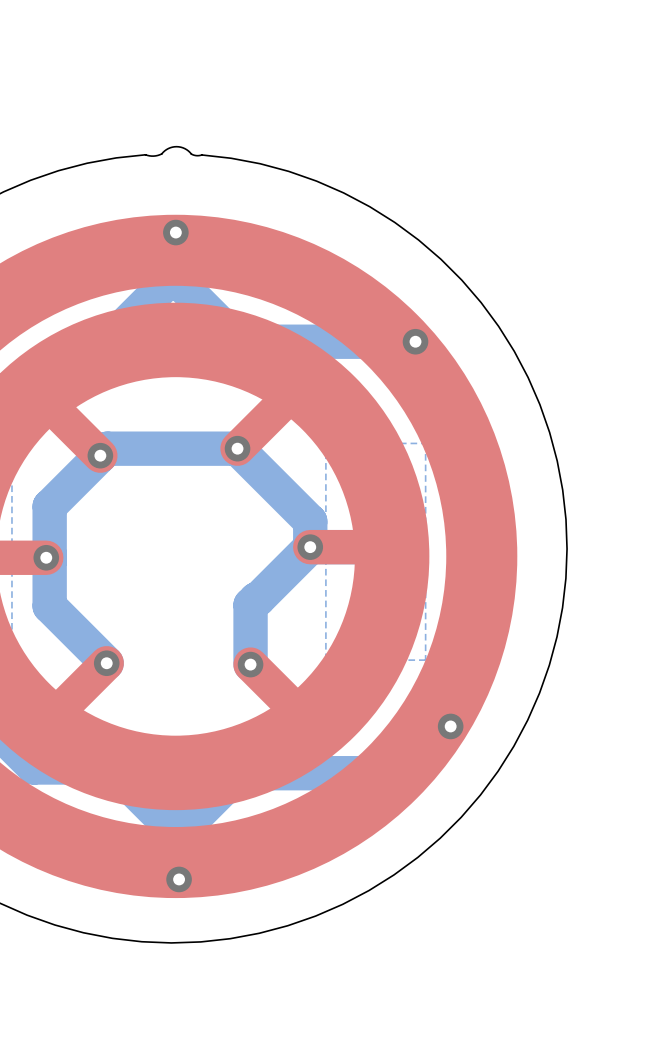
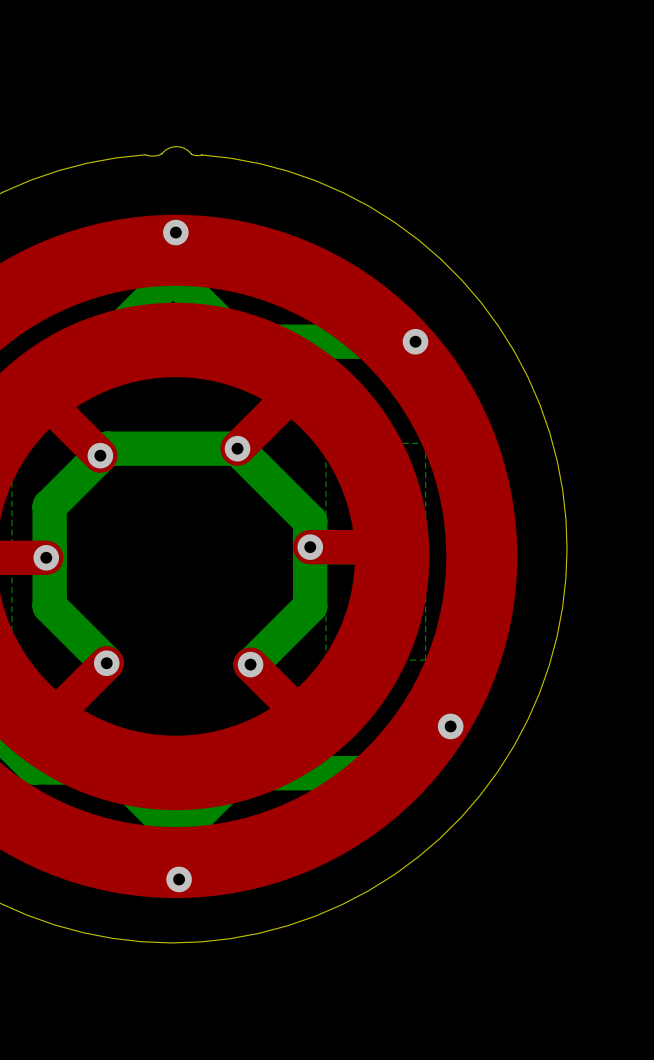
bottom track: (310, 547) (250, 604) (250, 664) -> (310, 547) (310, 606) (250, 664)

